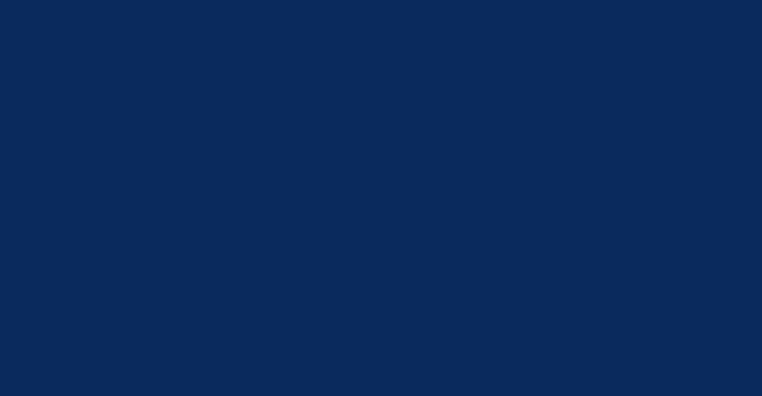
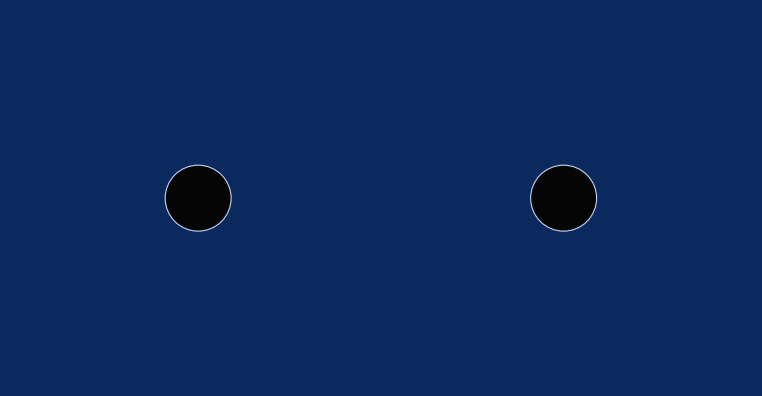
hole: none -> (198, 198)
hole: none -> (563, 198)

